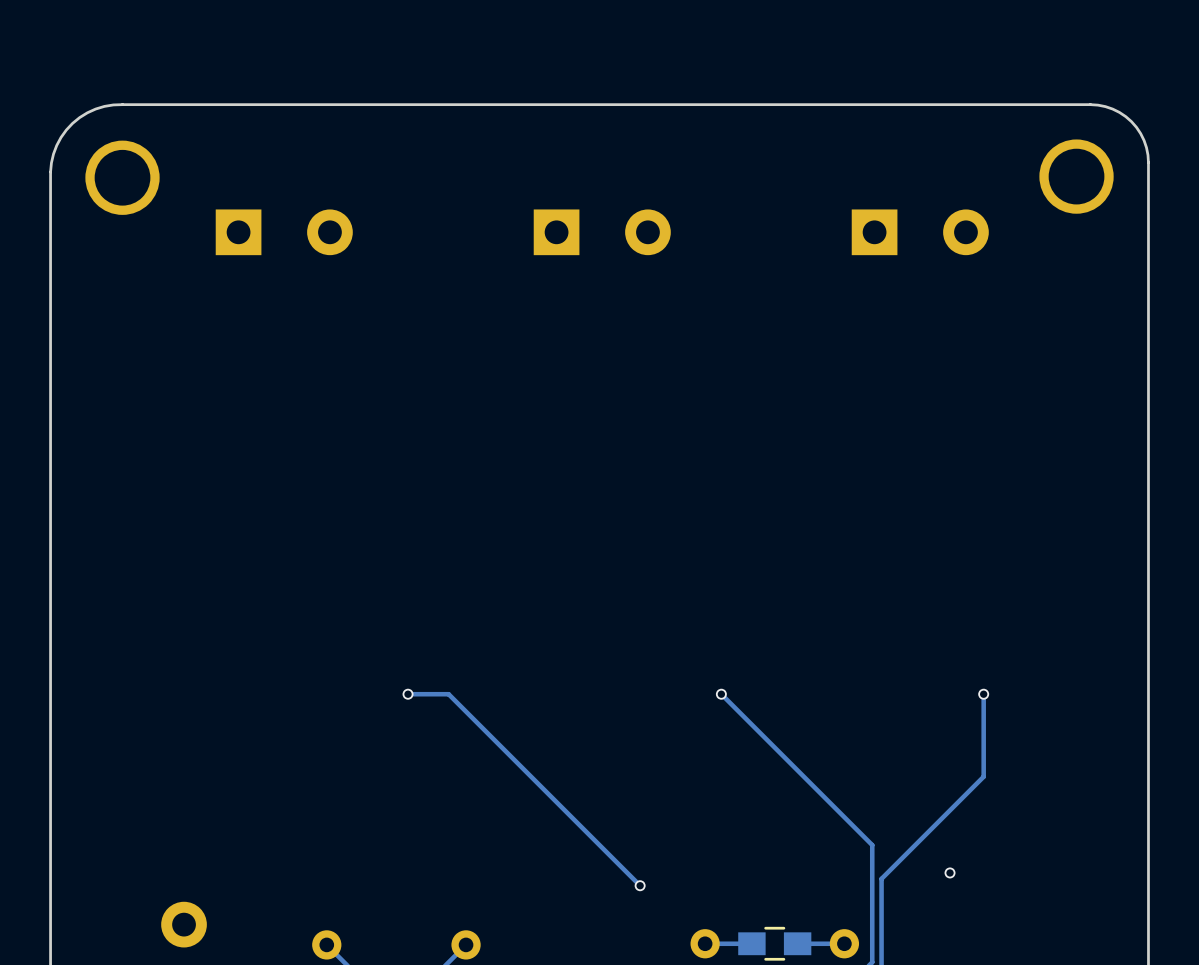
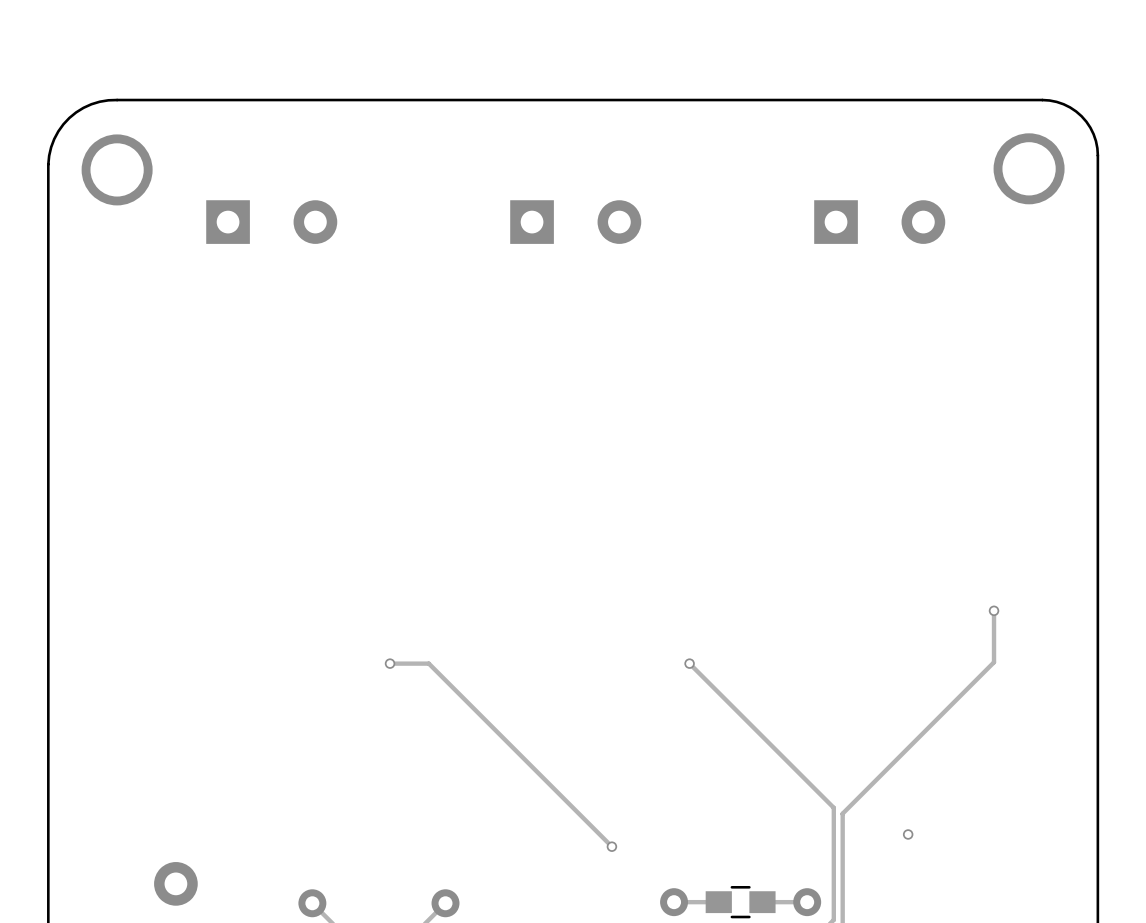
track: (983, 694) (983, 776) (881, 878) -> (994, 610) (994, 662) (842, 813) (842, 840)
via position: (983, 694) -> (994, 610)

